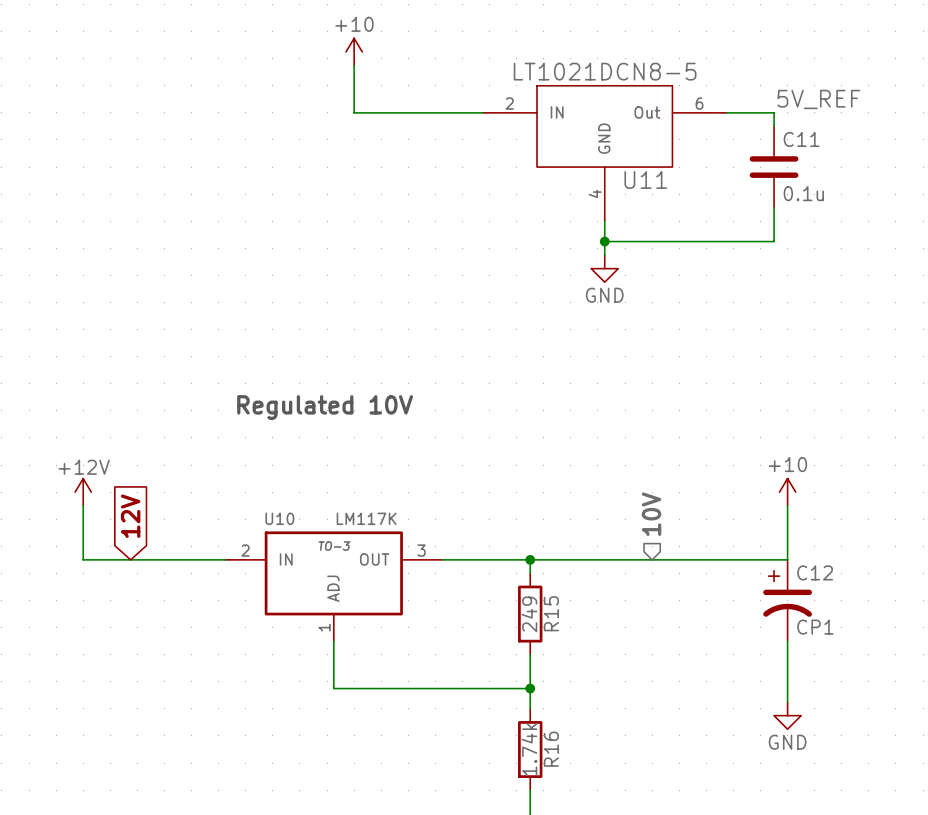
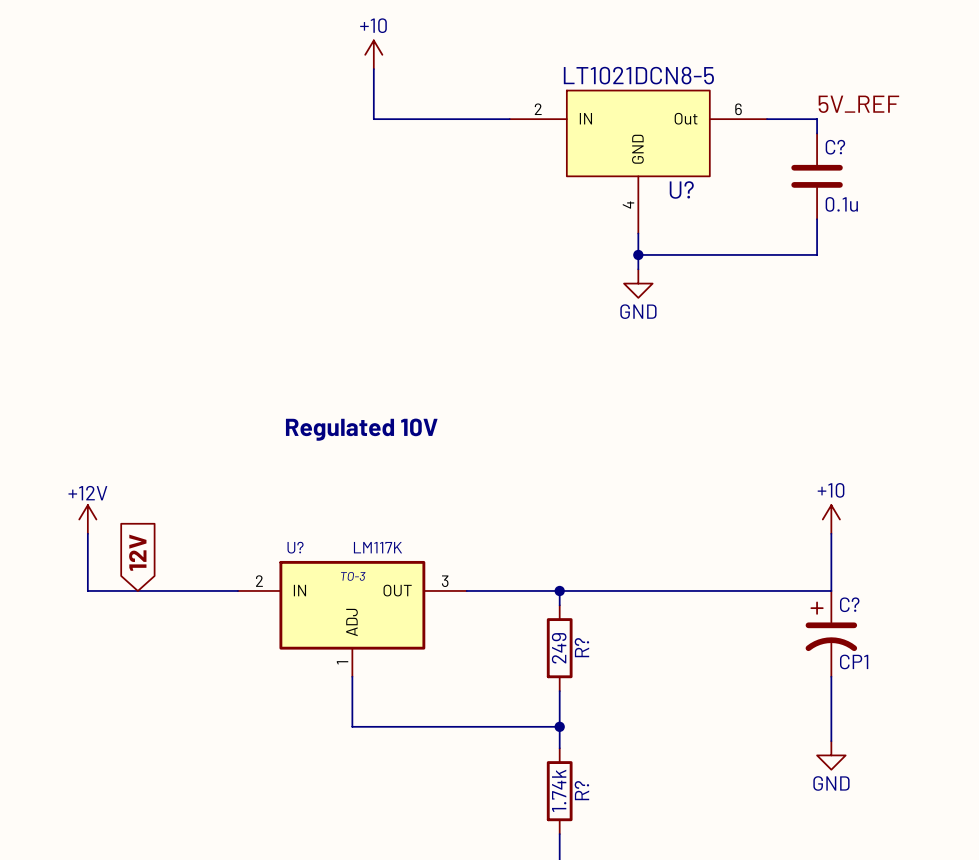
C11 name: C11 (801, 139) -> C? (835, 147)
U11 name: U11 (645, 179) -> U? (681, 189)
hierarchical label: 10V (651, 514) -> none
U10 name: U10 (279, 518) -> U? (295, 547)
C12 name: C12 (815, 572) -> C? (849, 604)
R15 name: R15 (551, 613) -> R? (581, 647)
R16 name: R16 (551, 749) -> R? (581, 790)

